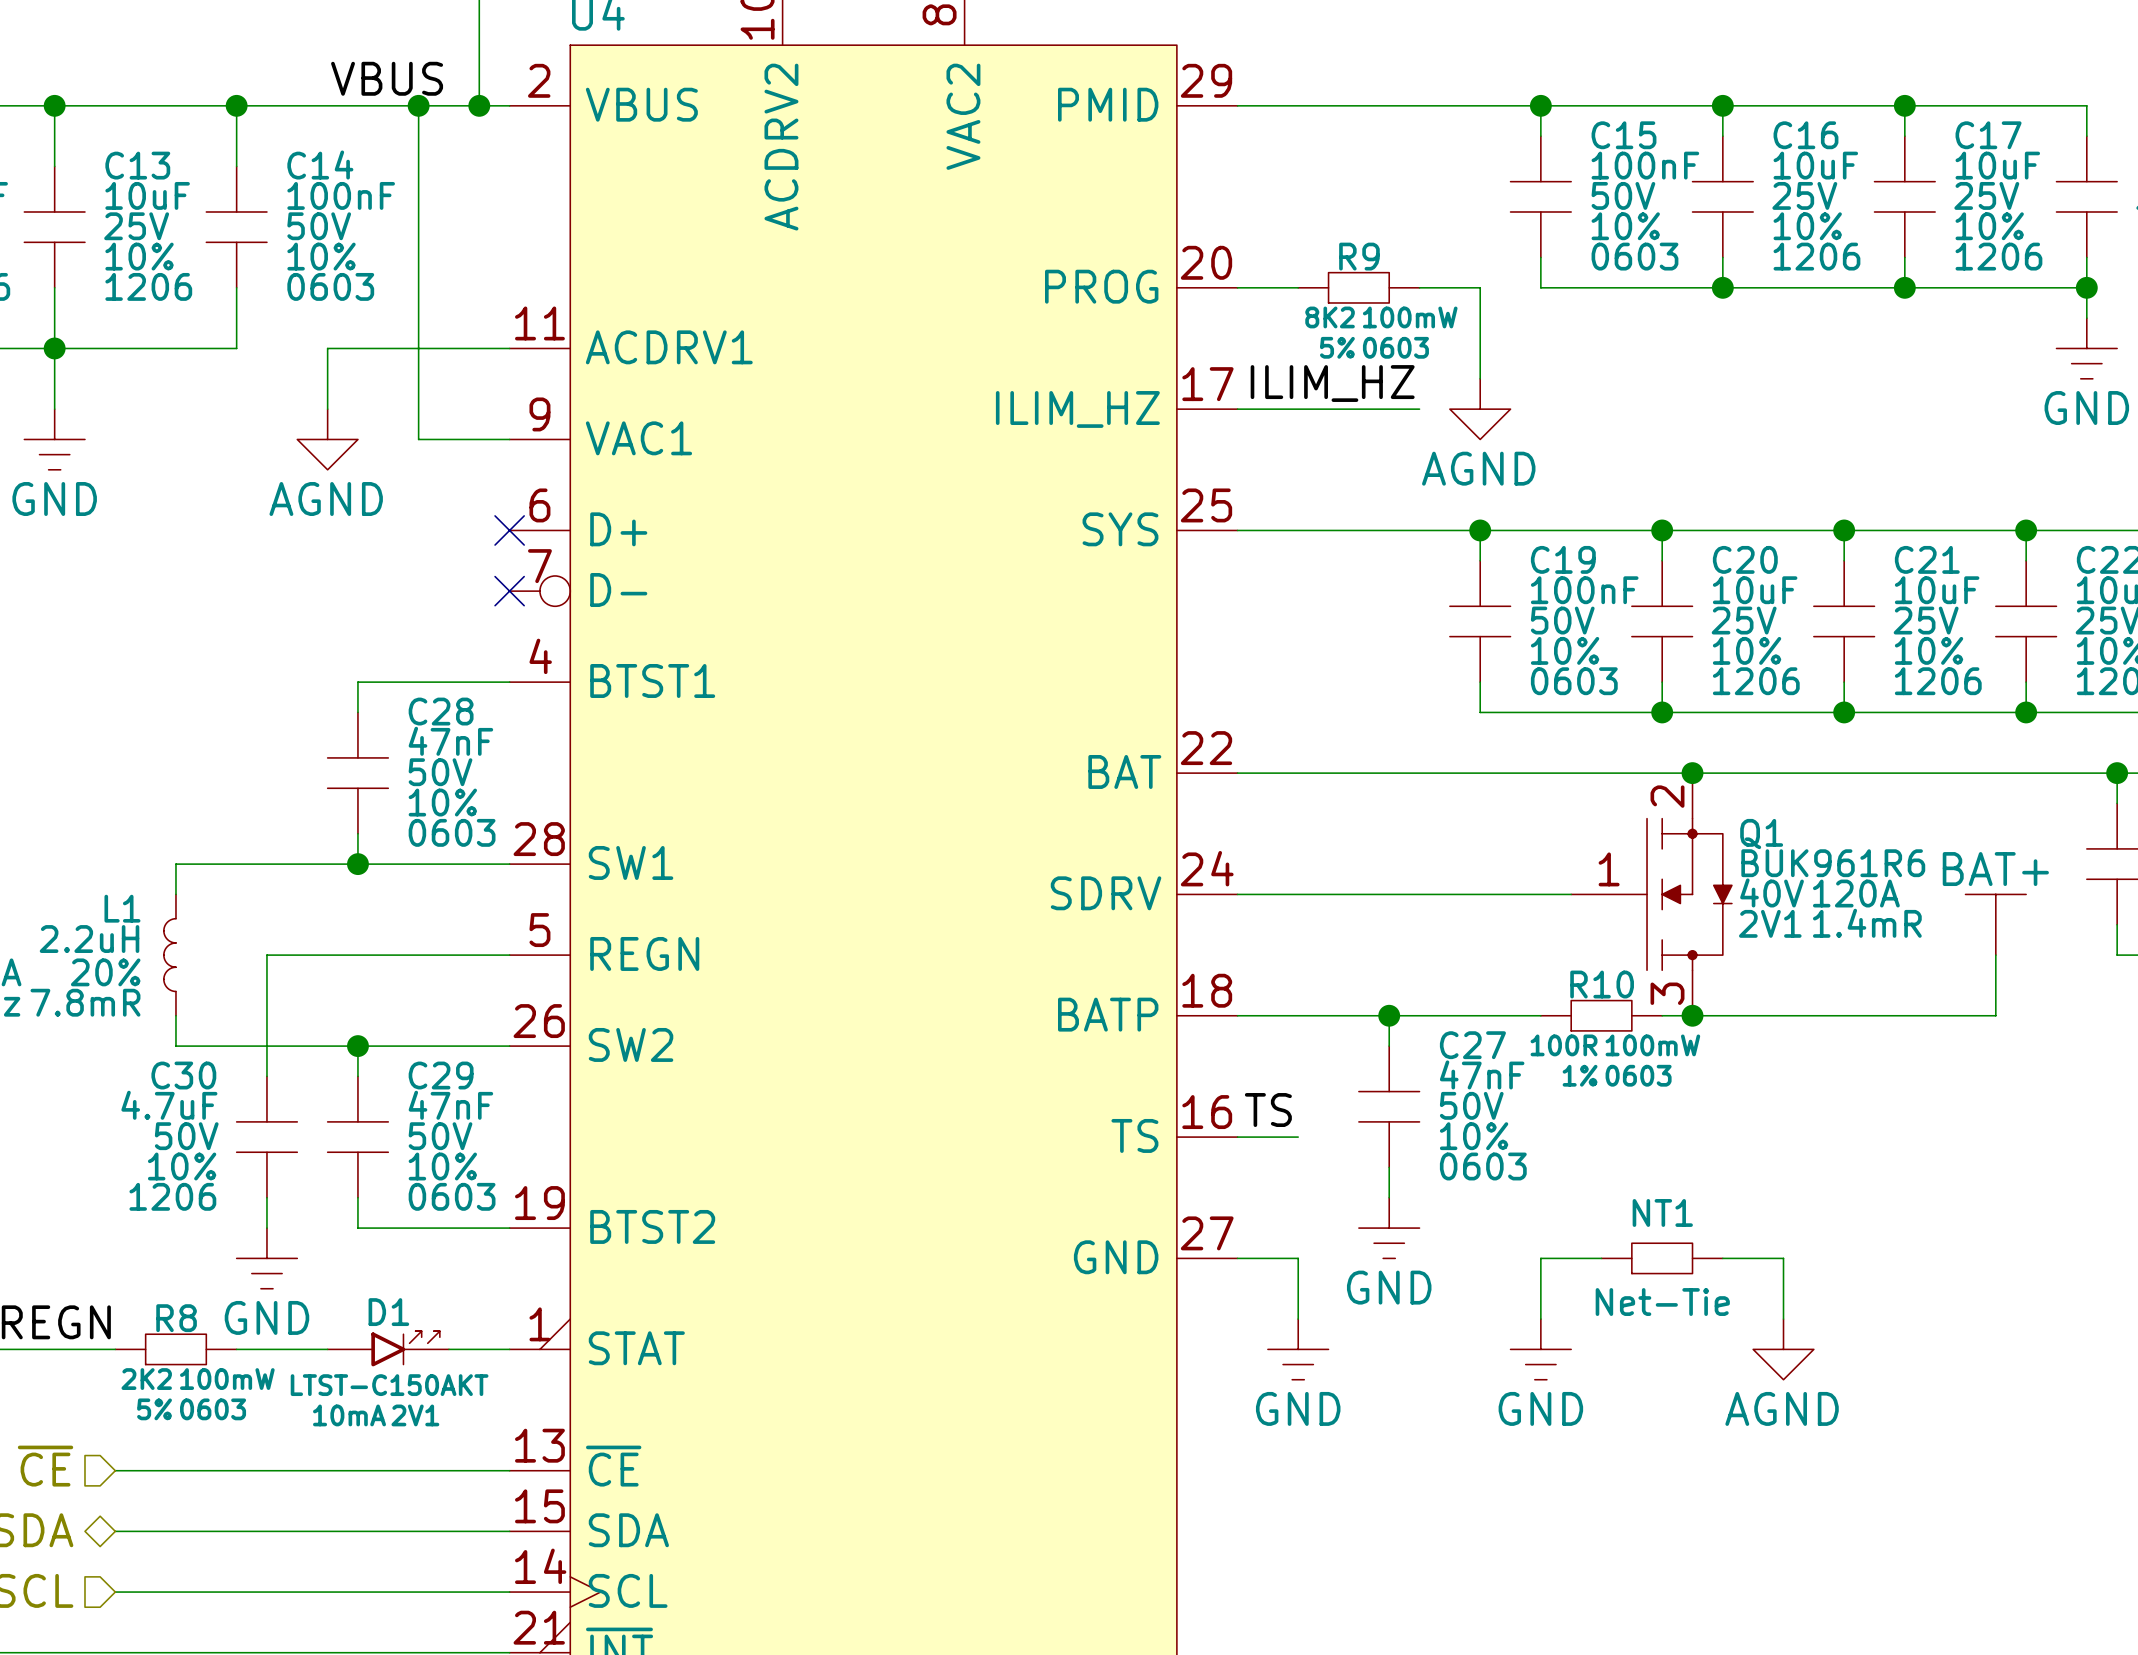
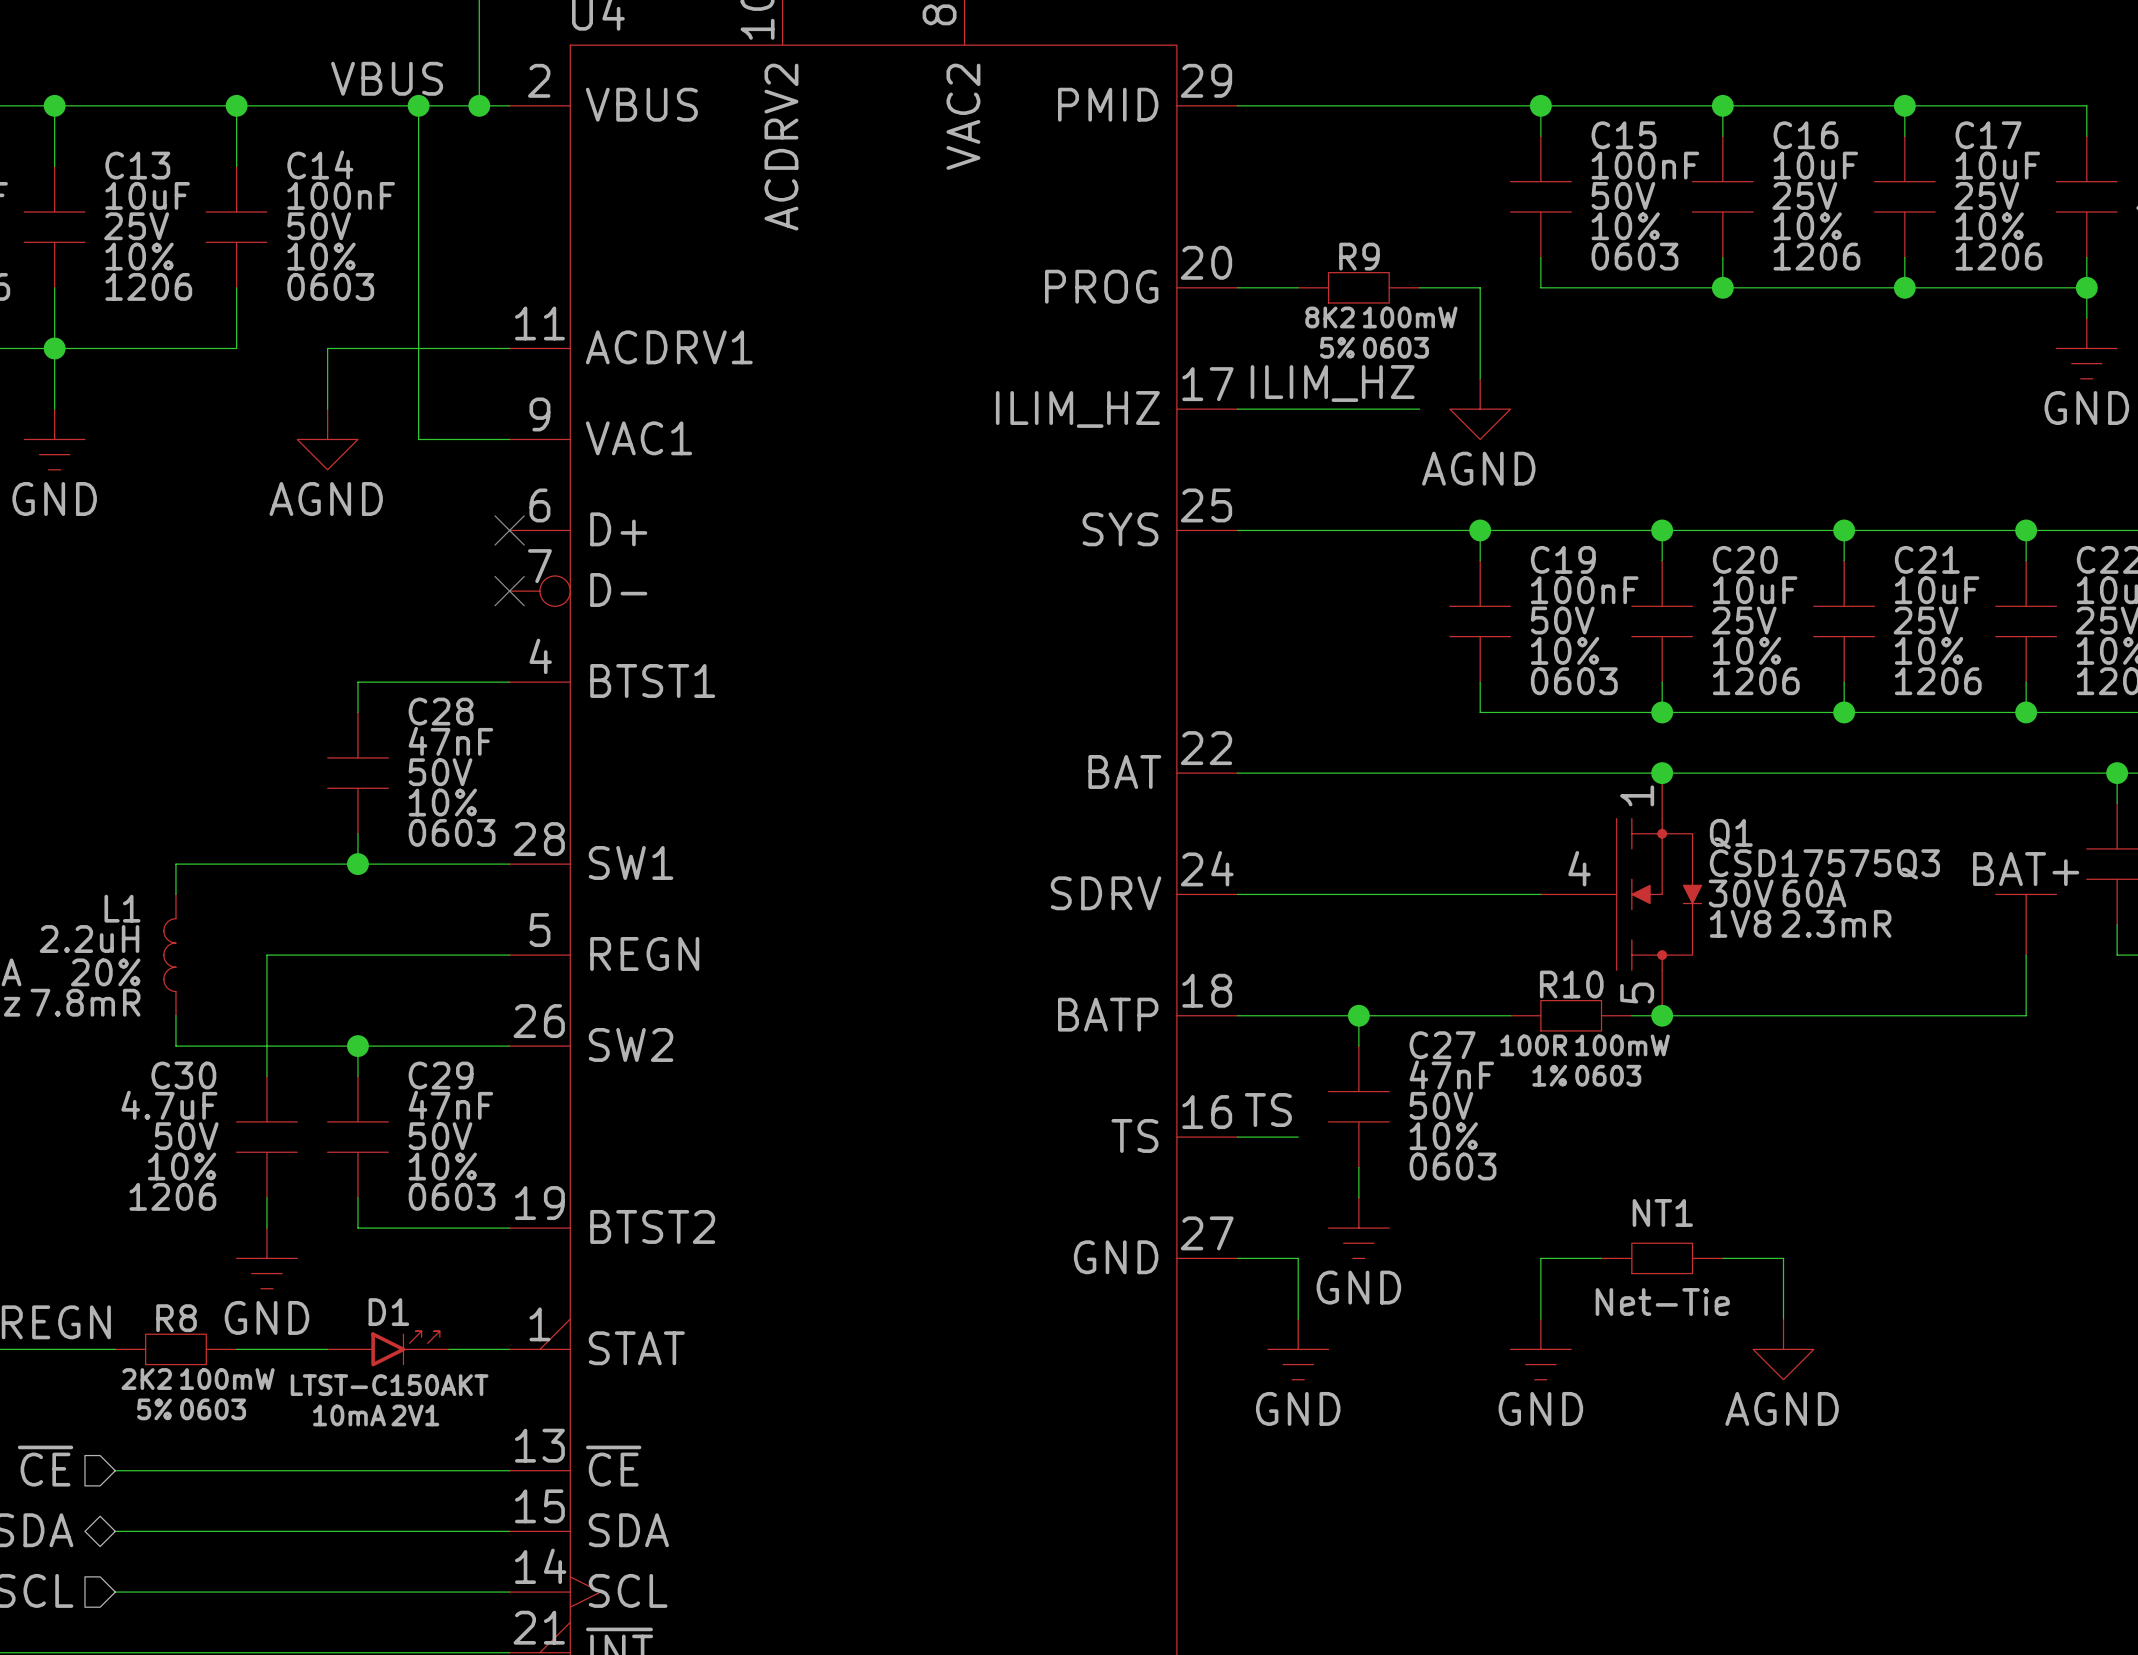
junction position: (1692, 773) -> (1662, 773)
Q1 pin number: 2 (1667, 796) -> 1 (1637, 795)
Q1 value: BUK961R6 (1833, 863) -> CSD17575Q3 (1824, 864)
Q1 pin number: 1 (1609, 869) -> 4 (1579, 868)
Q1 text: 40V (1772, 892) -> 30V (1741, 893)
Q1 text: 120A (1856, 893) -> 60A (1814, 893)
Q1 position: (1651, 894) -> (1621, 894)
Q1 text: 2V1 (1770, 923) -> 1V8 (1740, 923)
Q1 text: 1.4mR (1867, 923) -> 2.3mR (1836, 923)
power symbol position: BAT+ (1995, 924) -> BAT+ (2026, 924)
wire: (1995, 955) (1995, 1015) -> (2026, 955) (2026, 1015) (1995, 1015)
Q1 pin number: 3 (1667, 993) -> 5 (1637, 993)
wire: (1389, 1015) (1389, 1046) -> (1358, 1015) (1358, 1046)
junction position: (1389, 1015) -> (1358, 1015)
R10 position: (1601, 1015) -> (1571, 1015)
junction position: (1692, 1015) -> (1662, 1015)
C27 position: (1389, 1106) -> (1358, 1106)
wire: (1389, 1167) (1389, 1197) -> (1358, 1167) (1358, 1197)
power symbol position: GND (1389, 1228) -> GND (1358, 1228)

